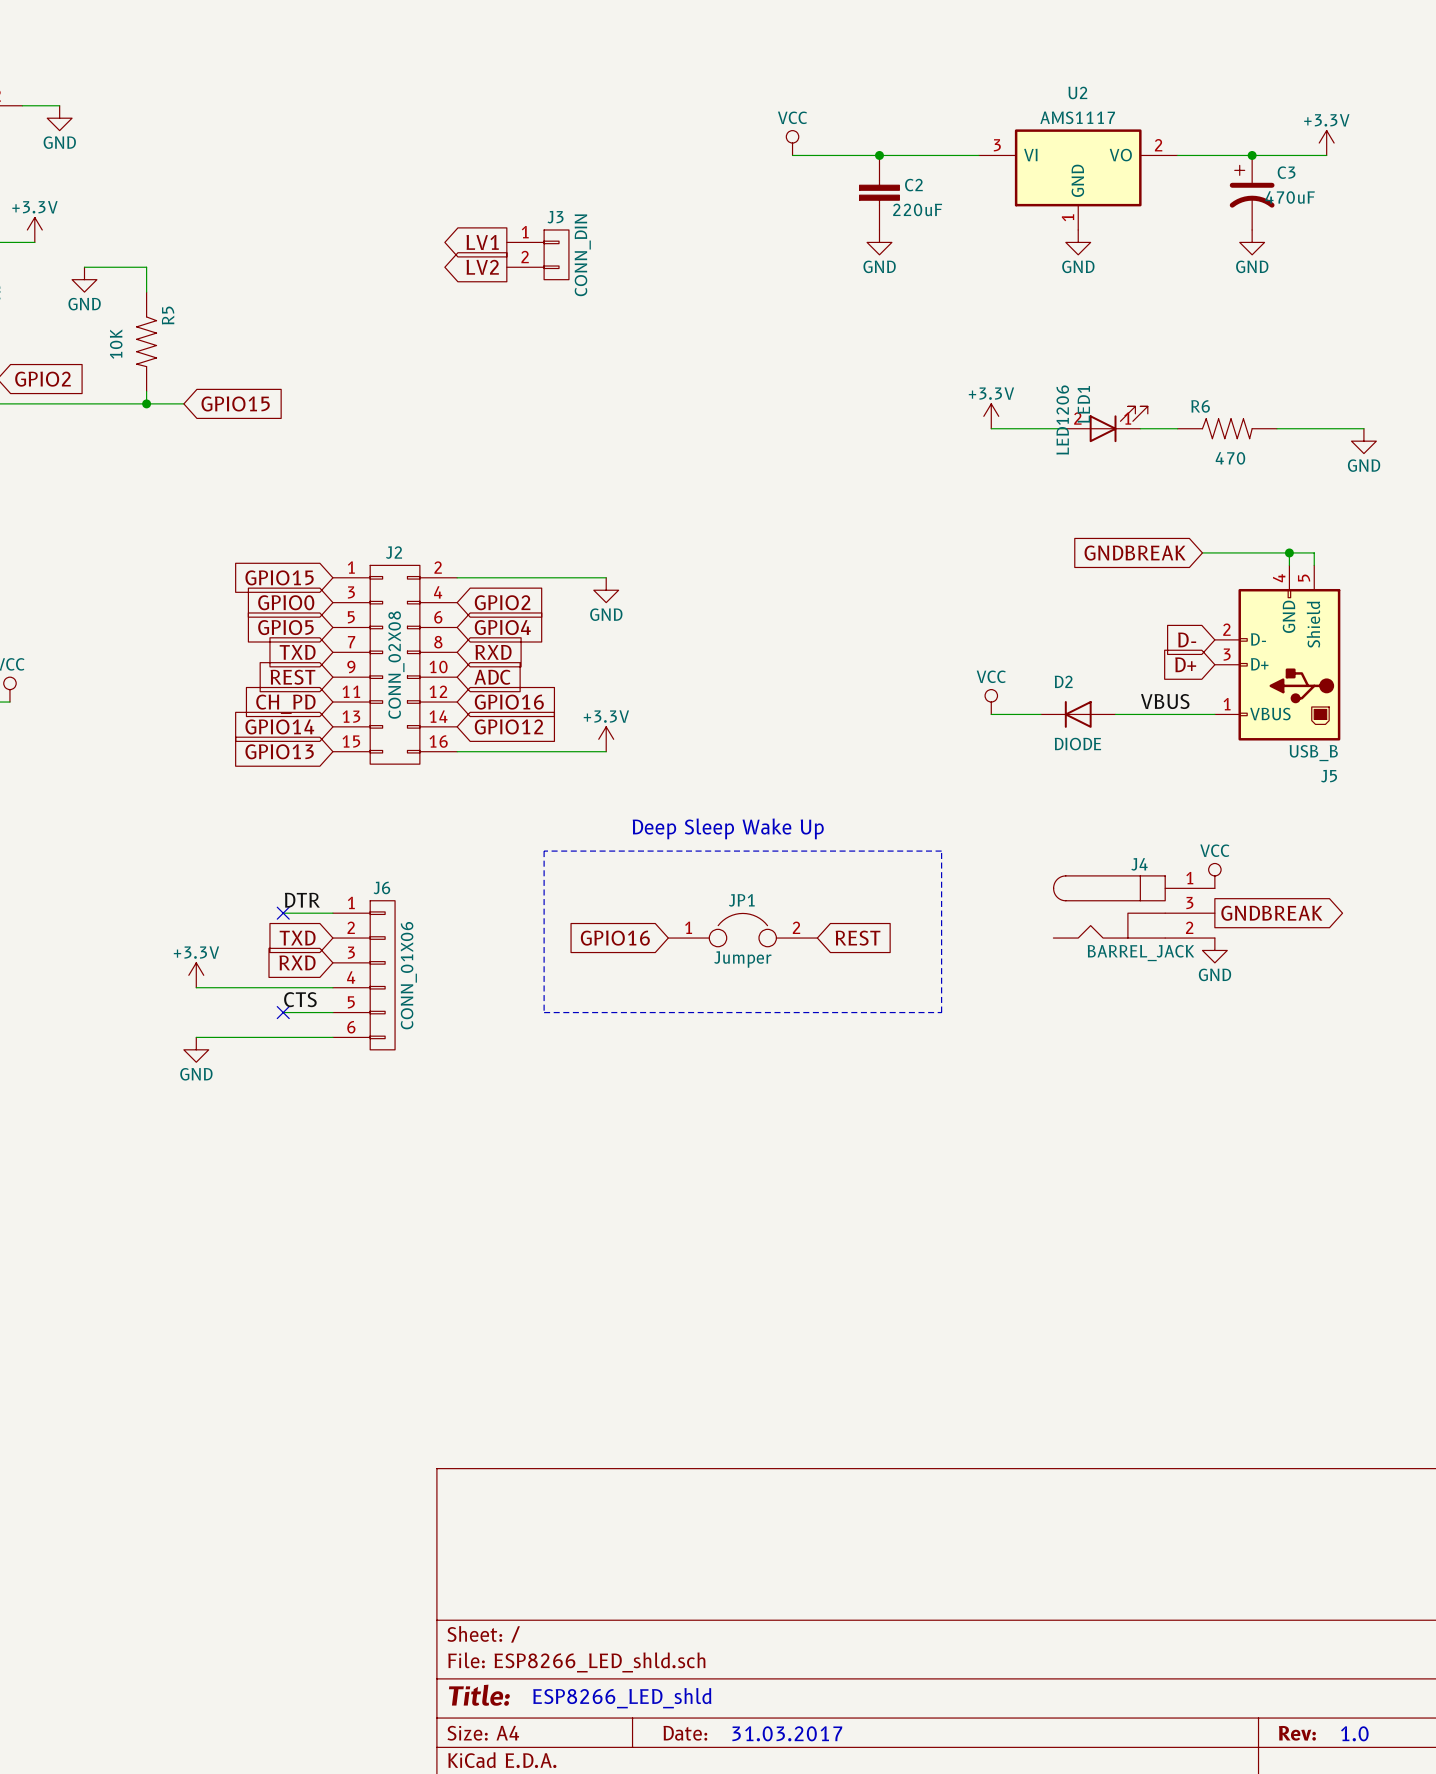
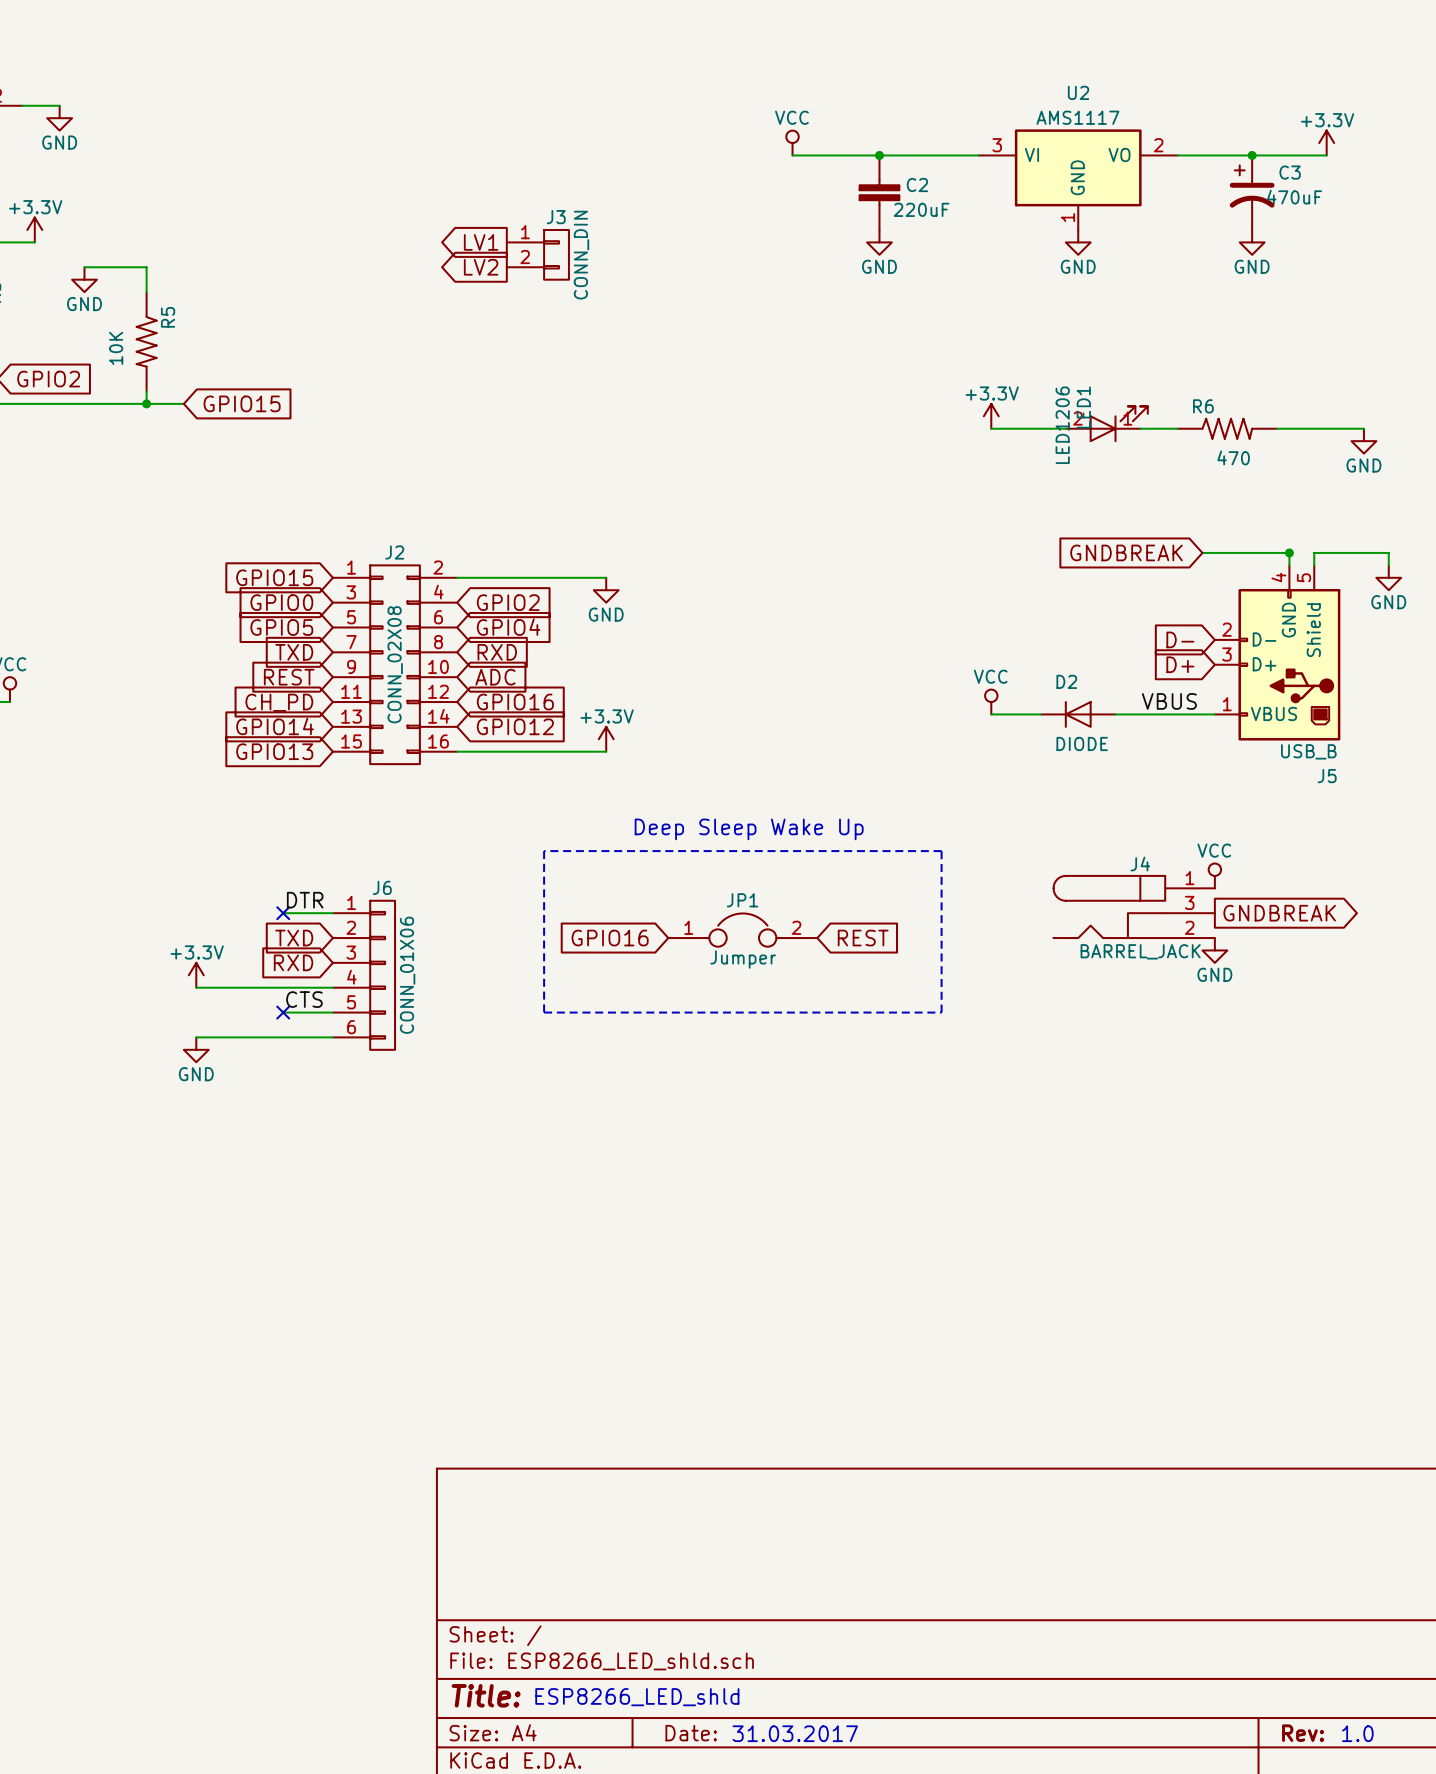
wire: (1289, 552) (1314, 552) -> (1388, 565) (1388, 552) (1314, 552)
power symbol: none -> GND (1388, 577)

